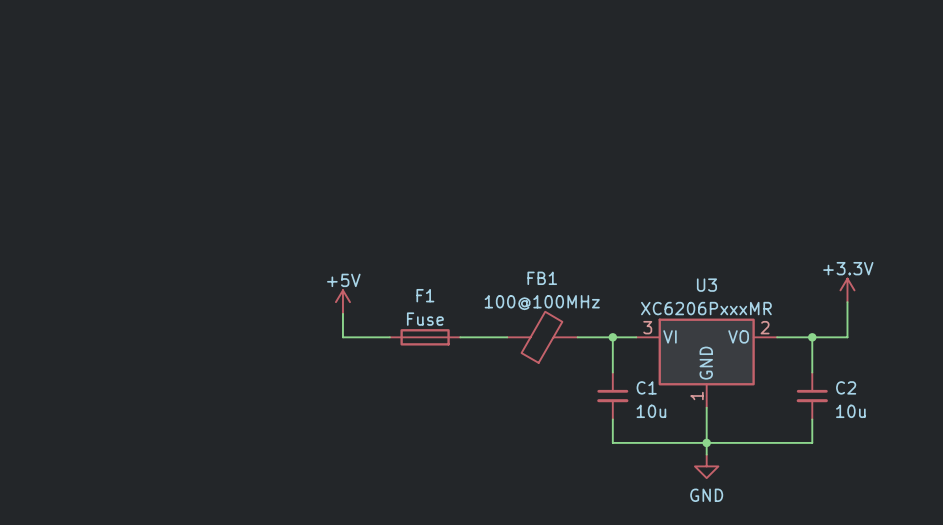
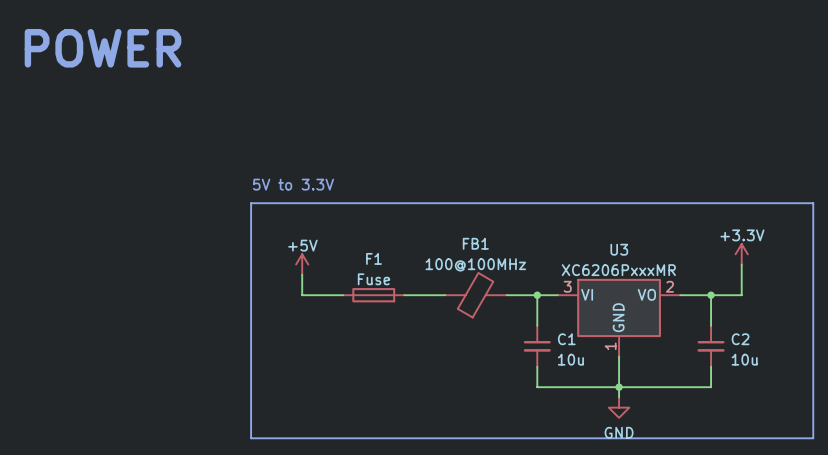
text: none -> POWER (103, 48)
text: none -> 5V to 3.3V (293, 184)
line: none -> (251, 203) (251, 438) (813, 438) (813, 203) (251, 203)

